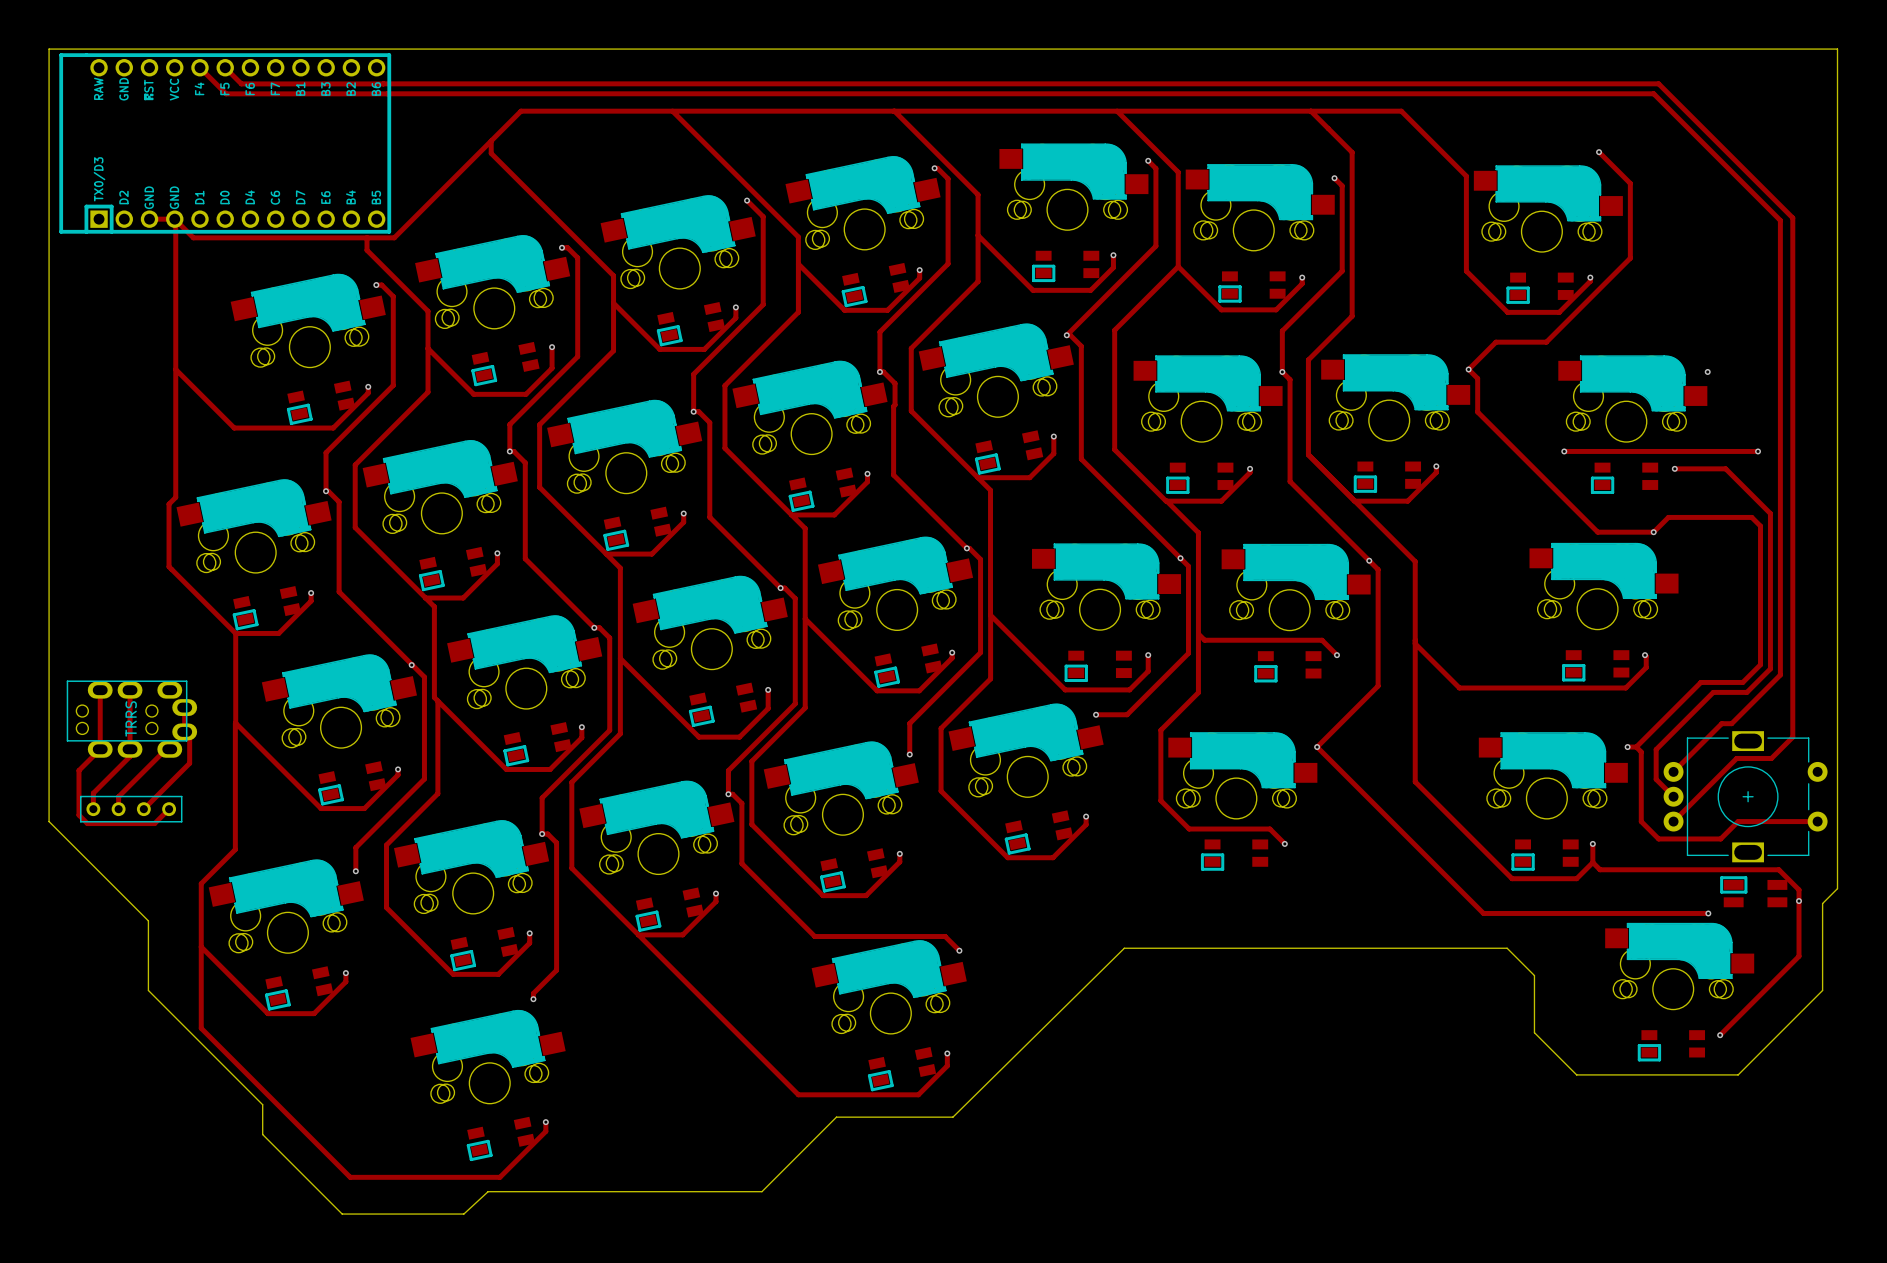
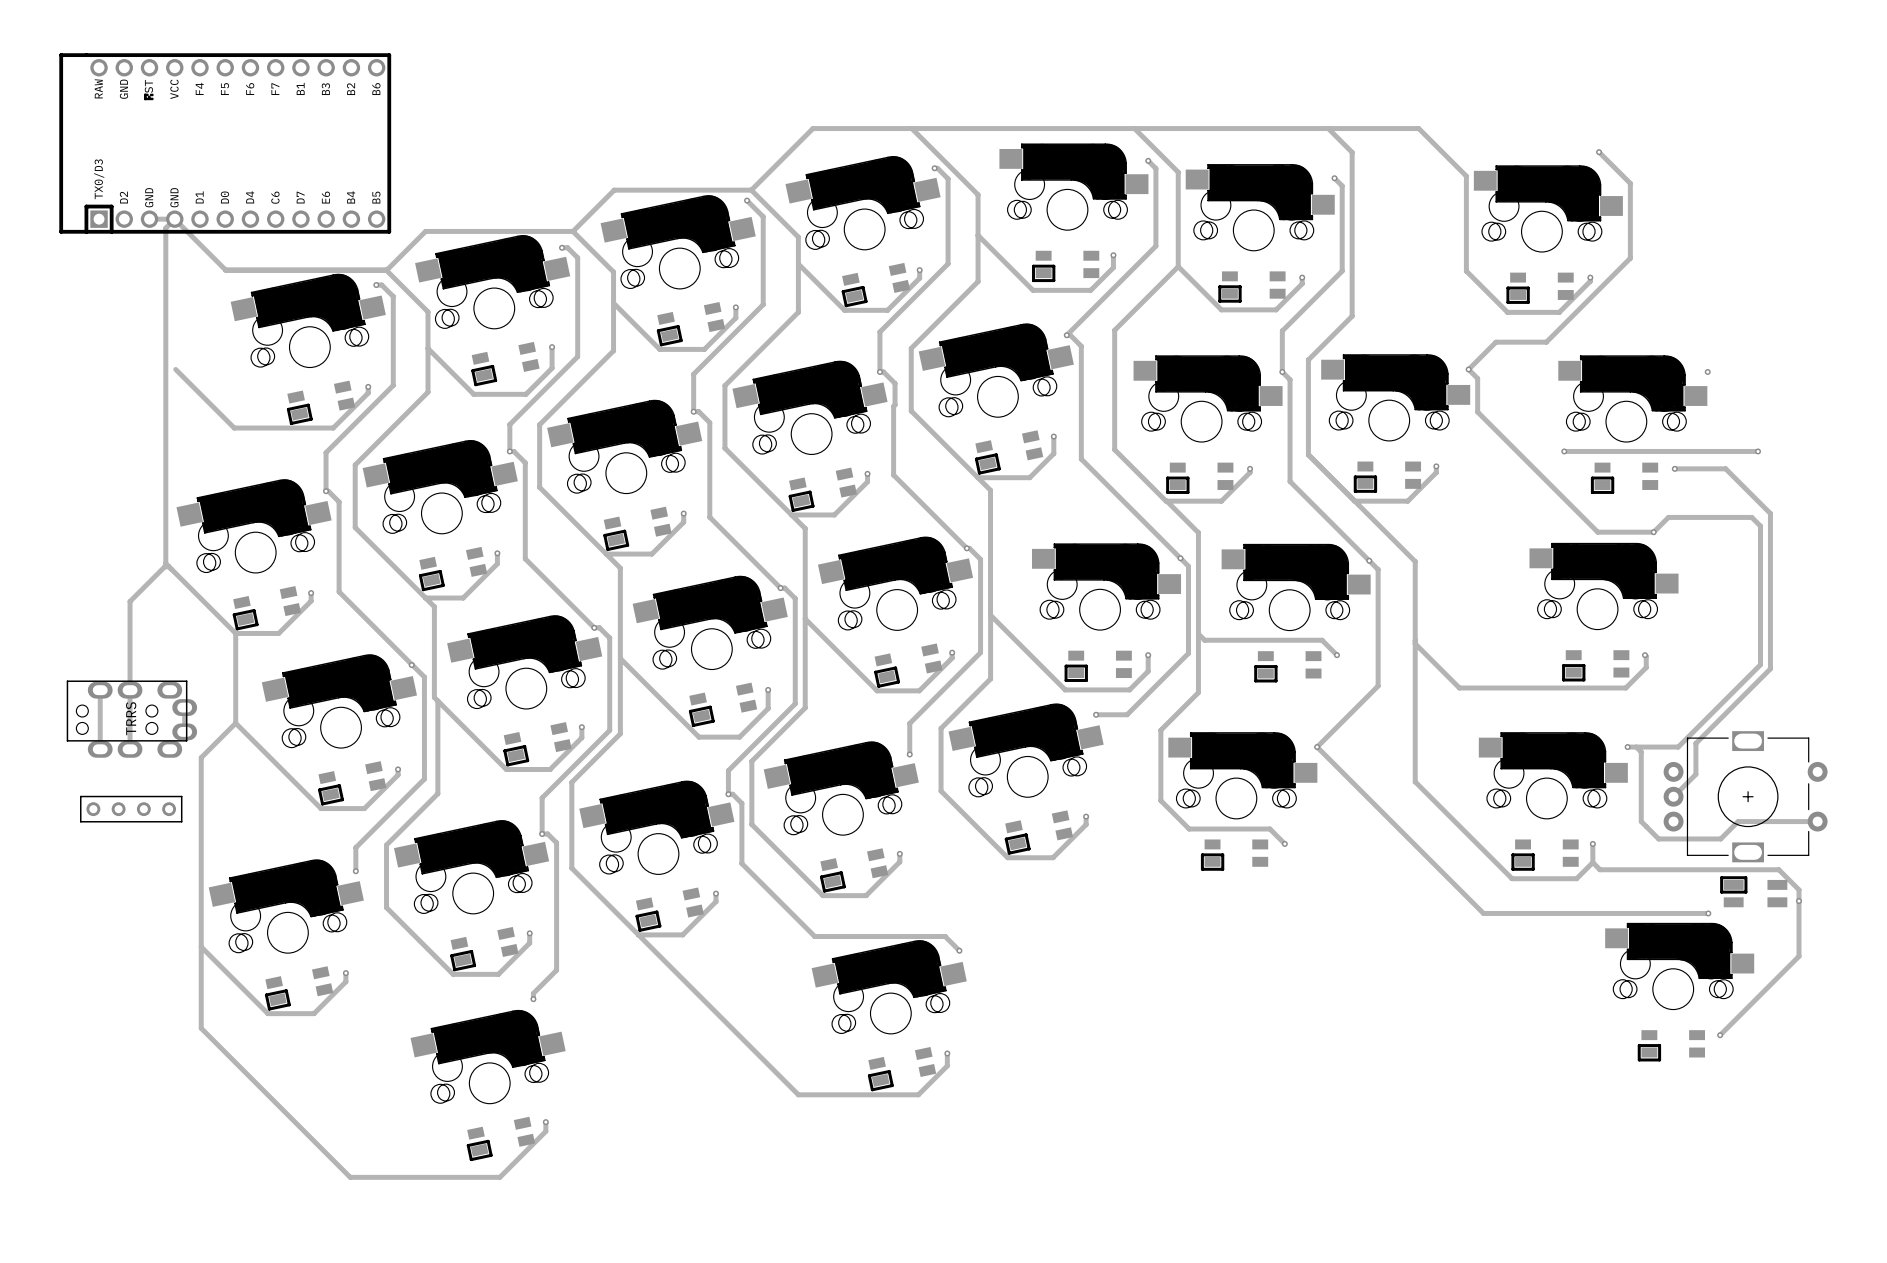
board edge: (49, 49) (1837, 49) (1837, 888) (1822, 903) (1822, 990) (1738, 1074) (1576, 1074) (1534, 1032) (1534, 975) (1507, 948) (1124, 948) (952, 1117) (836, 1117) (761, 1191) (488, 1191) (463, 1214) (342, 1214) (262, 1134) (262, 1104) (148, 990) (148, 920) (49, 821) (49, 49) -> none
track: (199, 67) (226, 93) (387, 93) -> none
track: (225, 67) (241, 83) (383, 83) -> none
track: (383, 83) (1658, 83) (1792, 217) (1792, 737) (1771, 758) (1736, 758) (1673, 821) -> none
track: (387, 93) (1653, 93) (1780, 220) (1780, 675) (1731, 723) (1721, 723) (1673, 771) -> none
track: (672, 111) (798, 237) -> (751, 190) (798, 237)
track: (894, 111) (911, 128) -> none
track: (1117, 111) (1134, 128) -> none
track: (1310, 111) (1328, 128) -> none
track: (1418, 128) (1401, 111) (521, 111) (394, 237) (193, 237) -> (1418, 128) (812, 128) (751, 190)
track: (491, 140) (491, 153) (613, 275) -> (572, 231) (613, 272) (613, 275)
track: none -> (751, 190) (614, 190) (572, 231)
track: none -> (174, 219) (165, 228) (165, 563) (169, 566) (164, 566) (130, 601) (130, 690)
track: (175, 220) (175, 497) (169, 504) (169, 566) -> none
track: none -> (572, 231) (425, 231) (386, 270) (225, 270) (193, 237)
track: (367, 237) (367, 250) (428, 311) -> (386, 270) (428, 311)
track: (1742, 682) (1700, 682) (1636, 747) -> (1742, 682) (1678, 747) (1636, 747)
track: (1746, 692) (1713, 692) (1656, 749) (1656, 779) (1673, 796) -> (1746, 692) (1695, 743) (1695, 774) (1673, 796)
track: (235, 723) (235, 849) (201, 883) -> (235, 723) (201, 757) (201, 883)
track: (184, 731) (189, 736) (189, 763) (143, 809) -> none
track: (100, 749) (78, 770) (78, 815) (87, 823) (154, 823) (169, 809) -> none
track: (130, 749) (130, 756) (93, 793) (93, 809) -> none
track: (169, 749) (166, 749) (118, 796) (118, 809) -> none

